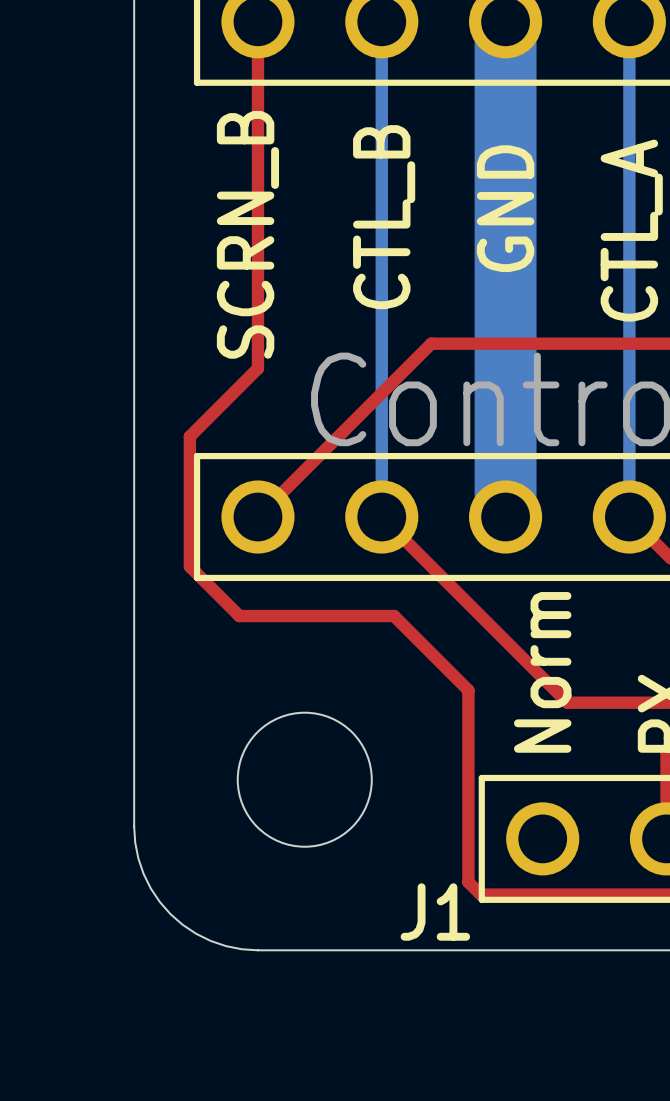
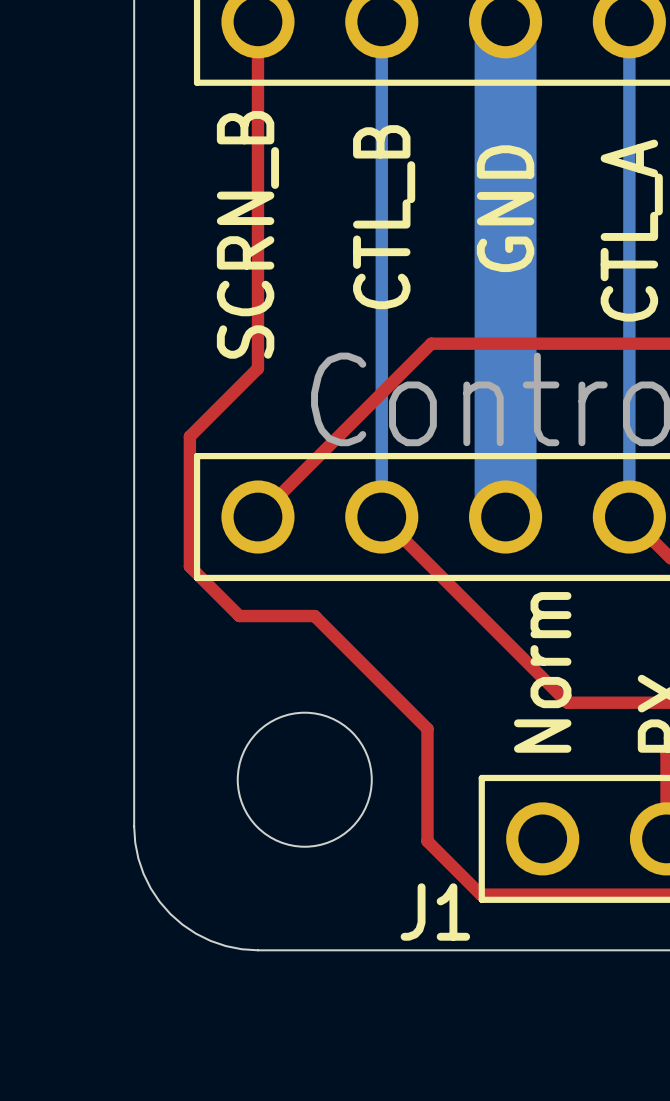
top track: (314, 616) (394, 616) (468, 690) (468, 882) -> (314, 616) (427, 728) (427, 841) (468, 882)

